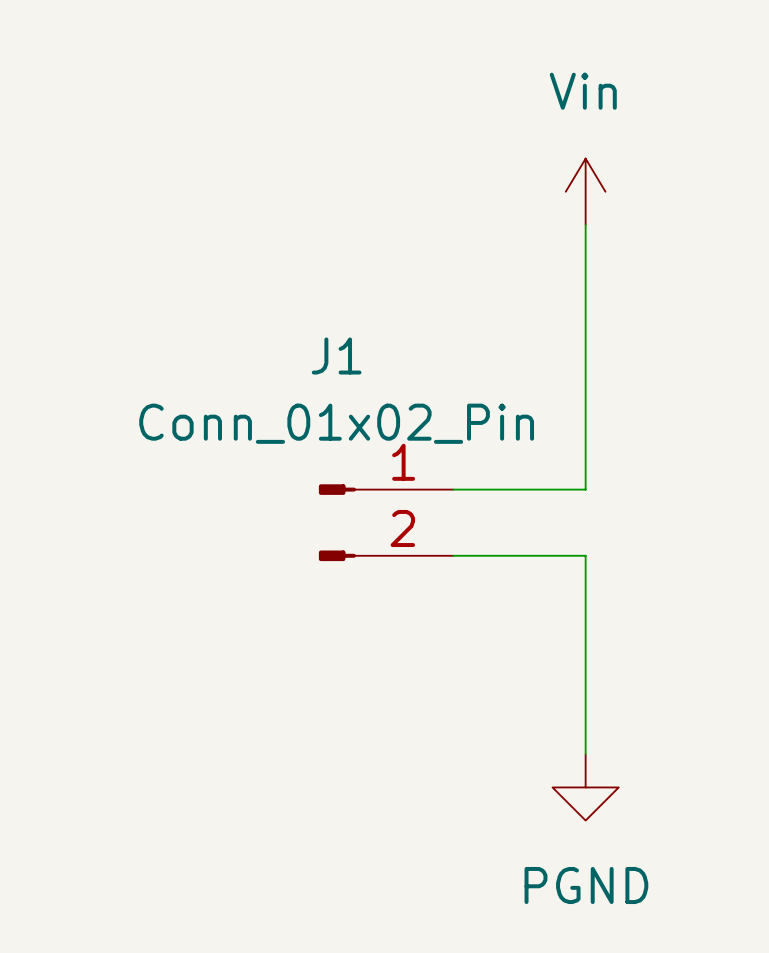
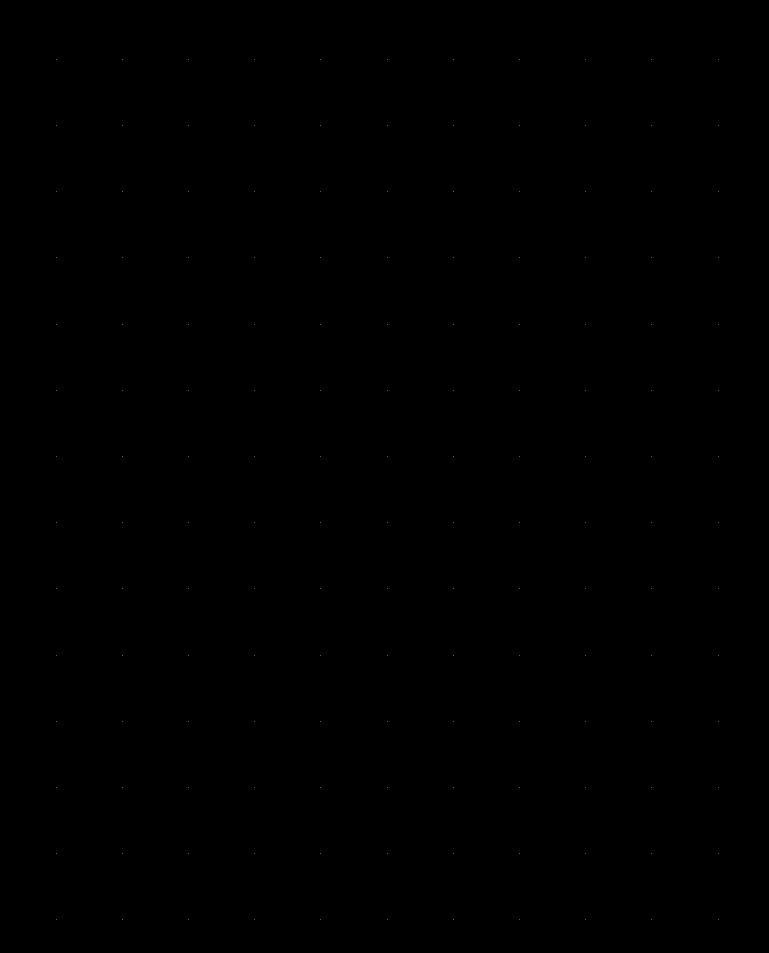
power symbol: Vin (585, 191) -> none
wire: (585, 224) (585, 489) (453, 489) -> none
J1: Conn_01x02_Pin (386, 522) -> none
wire: (453, 555) (585, 555) (585, 754) -> none
power symbol: PGND (585, 787) -> none

